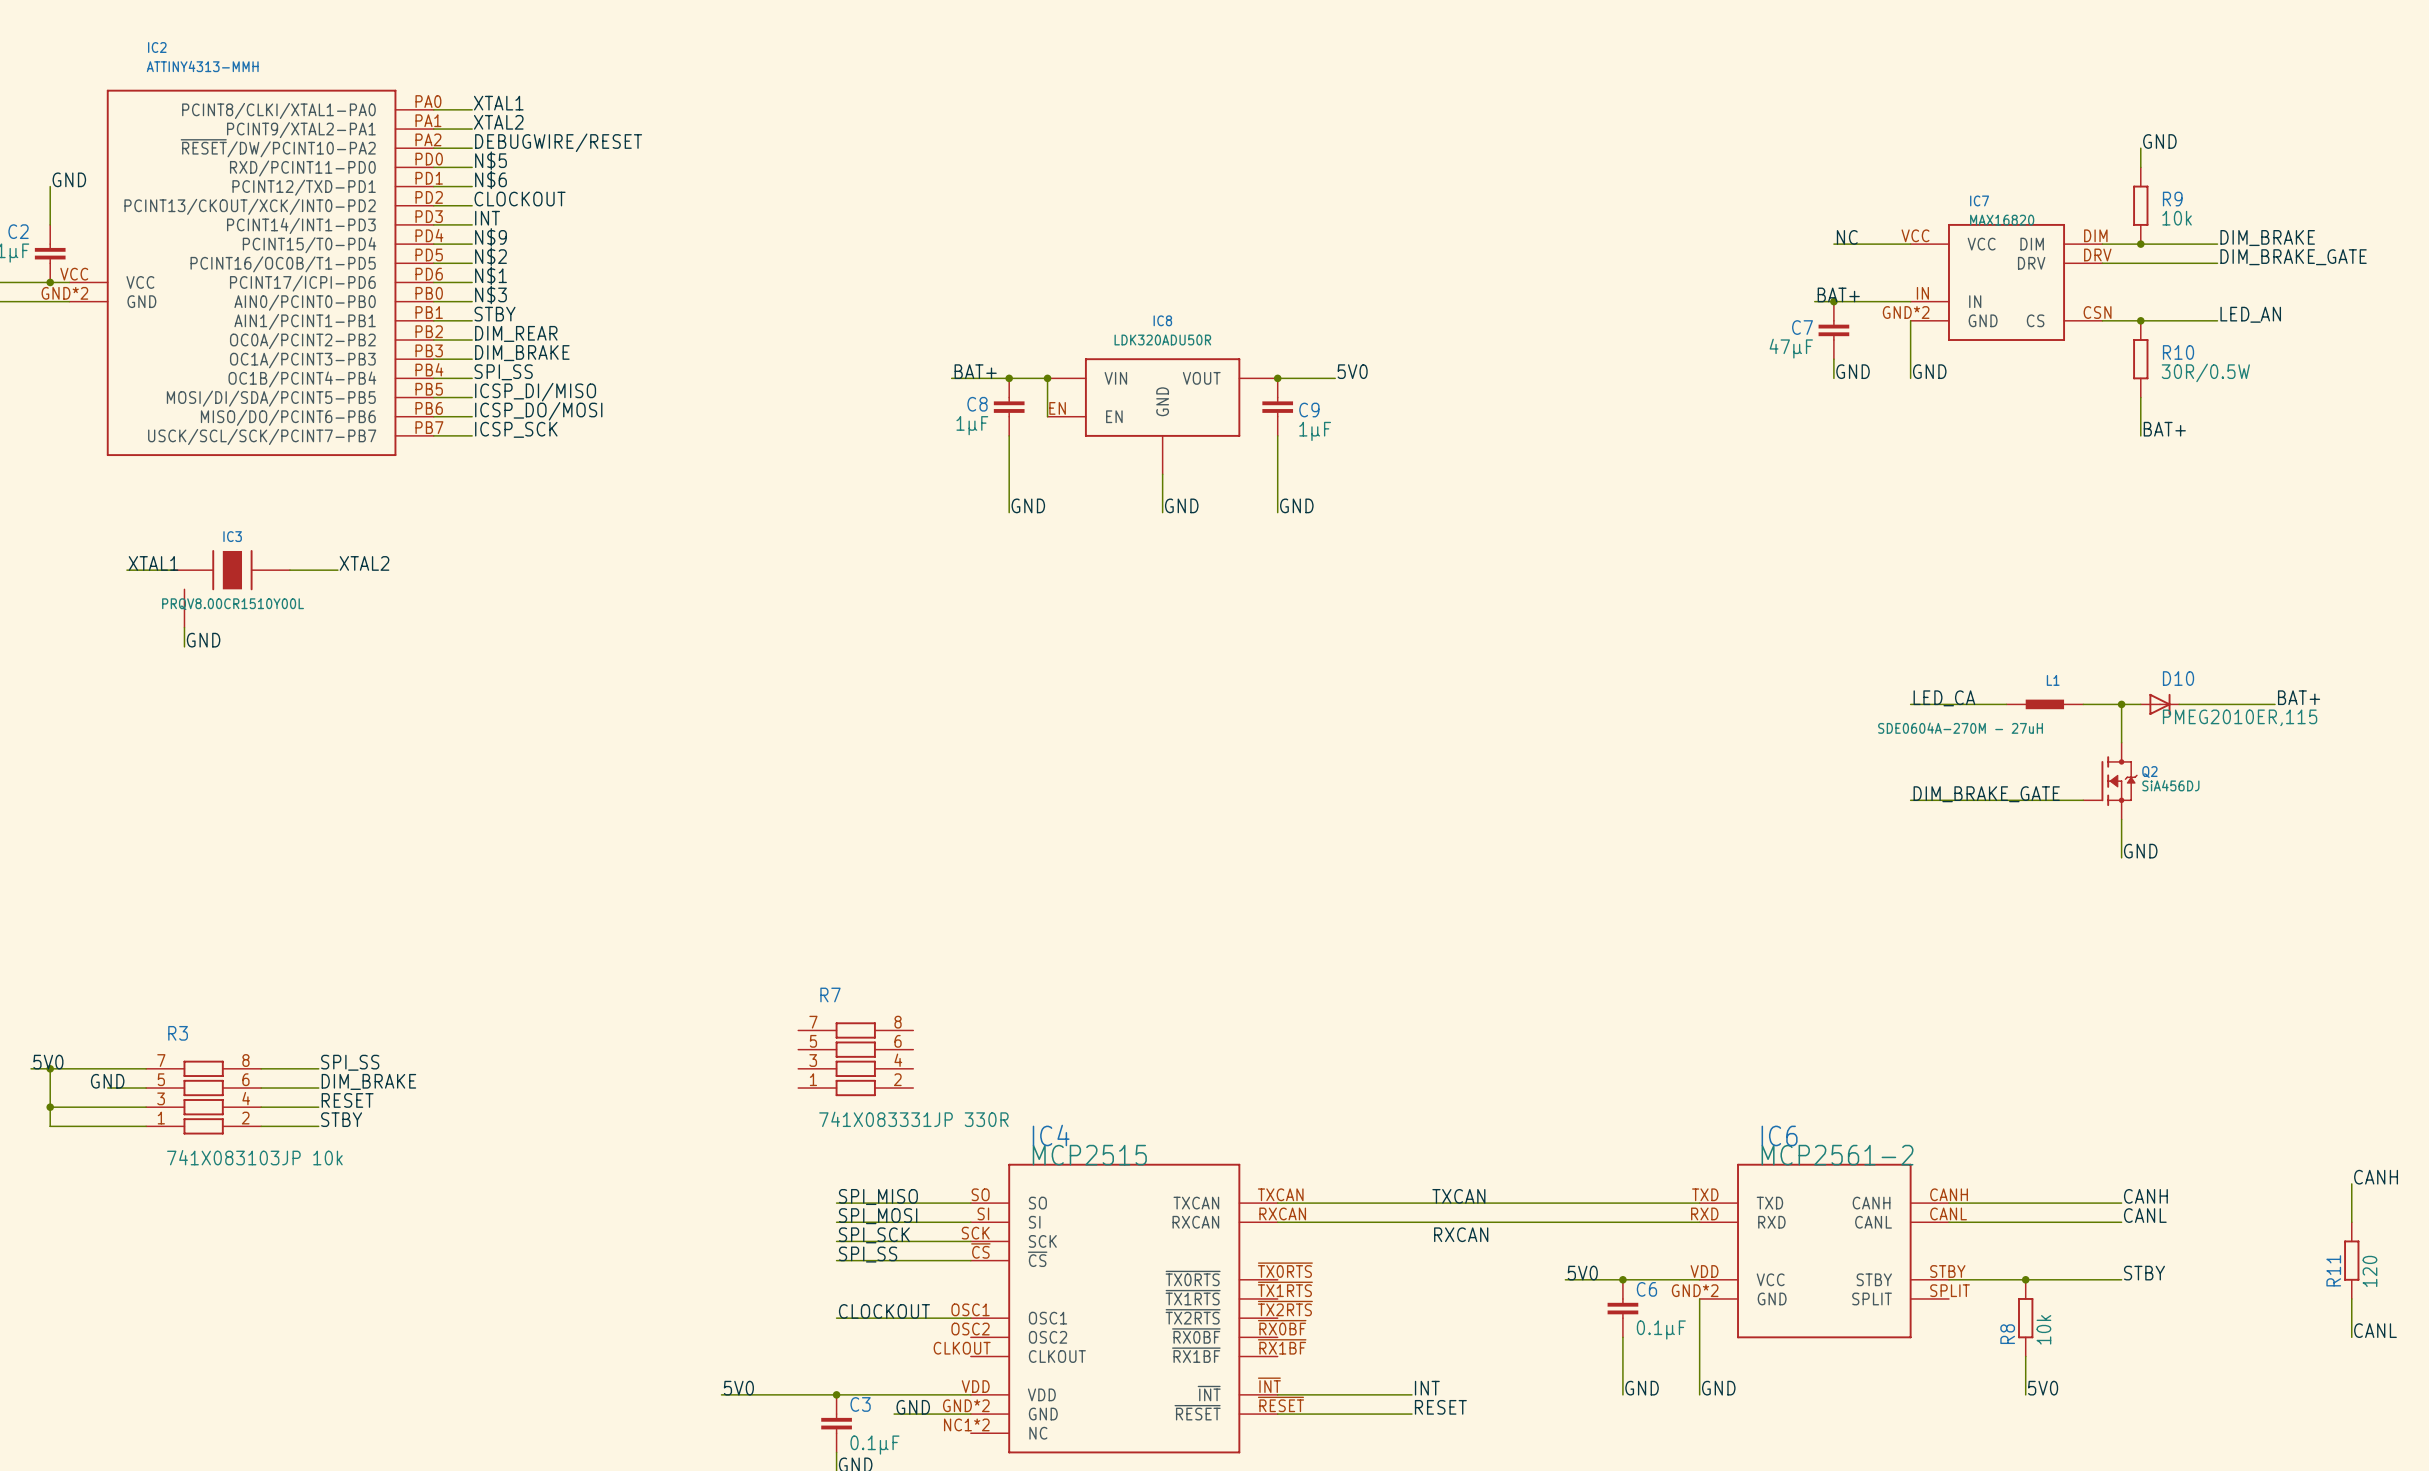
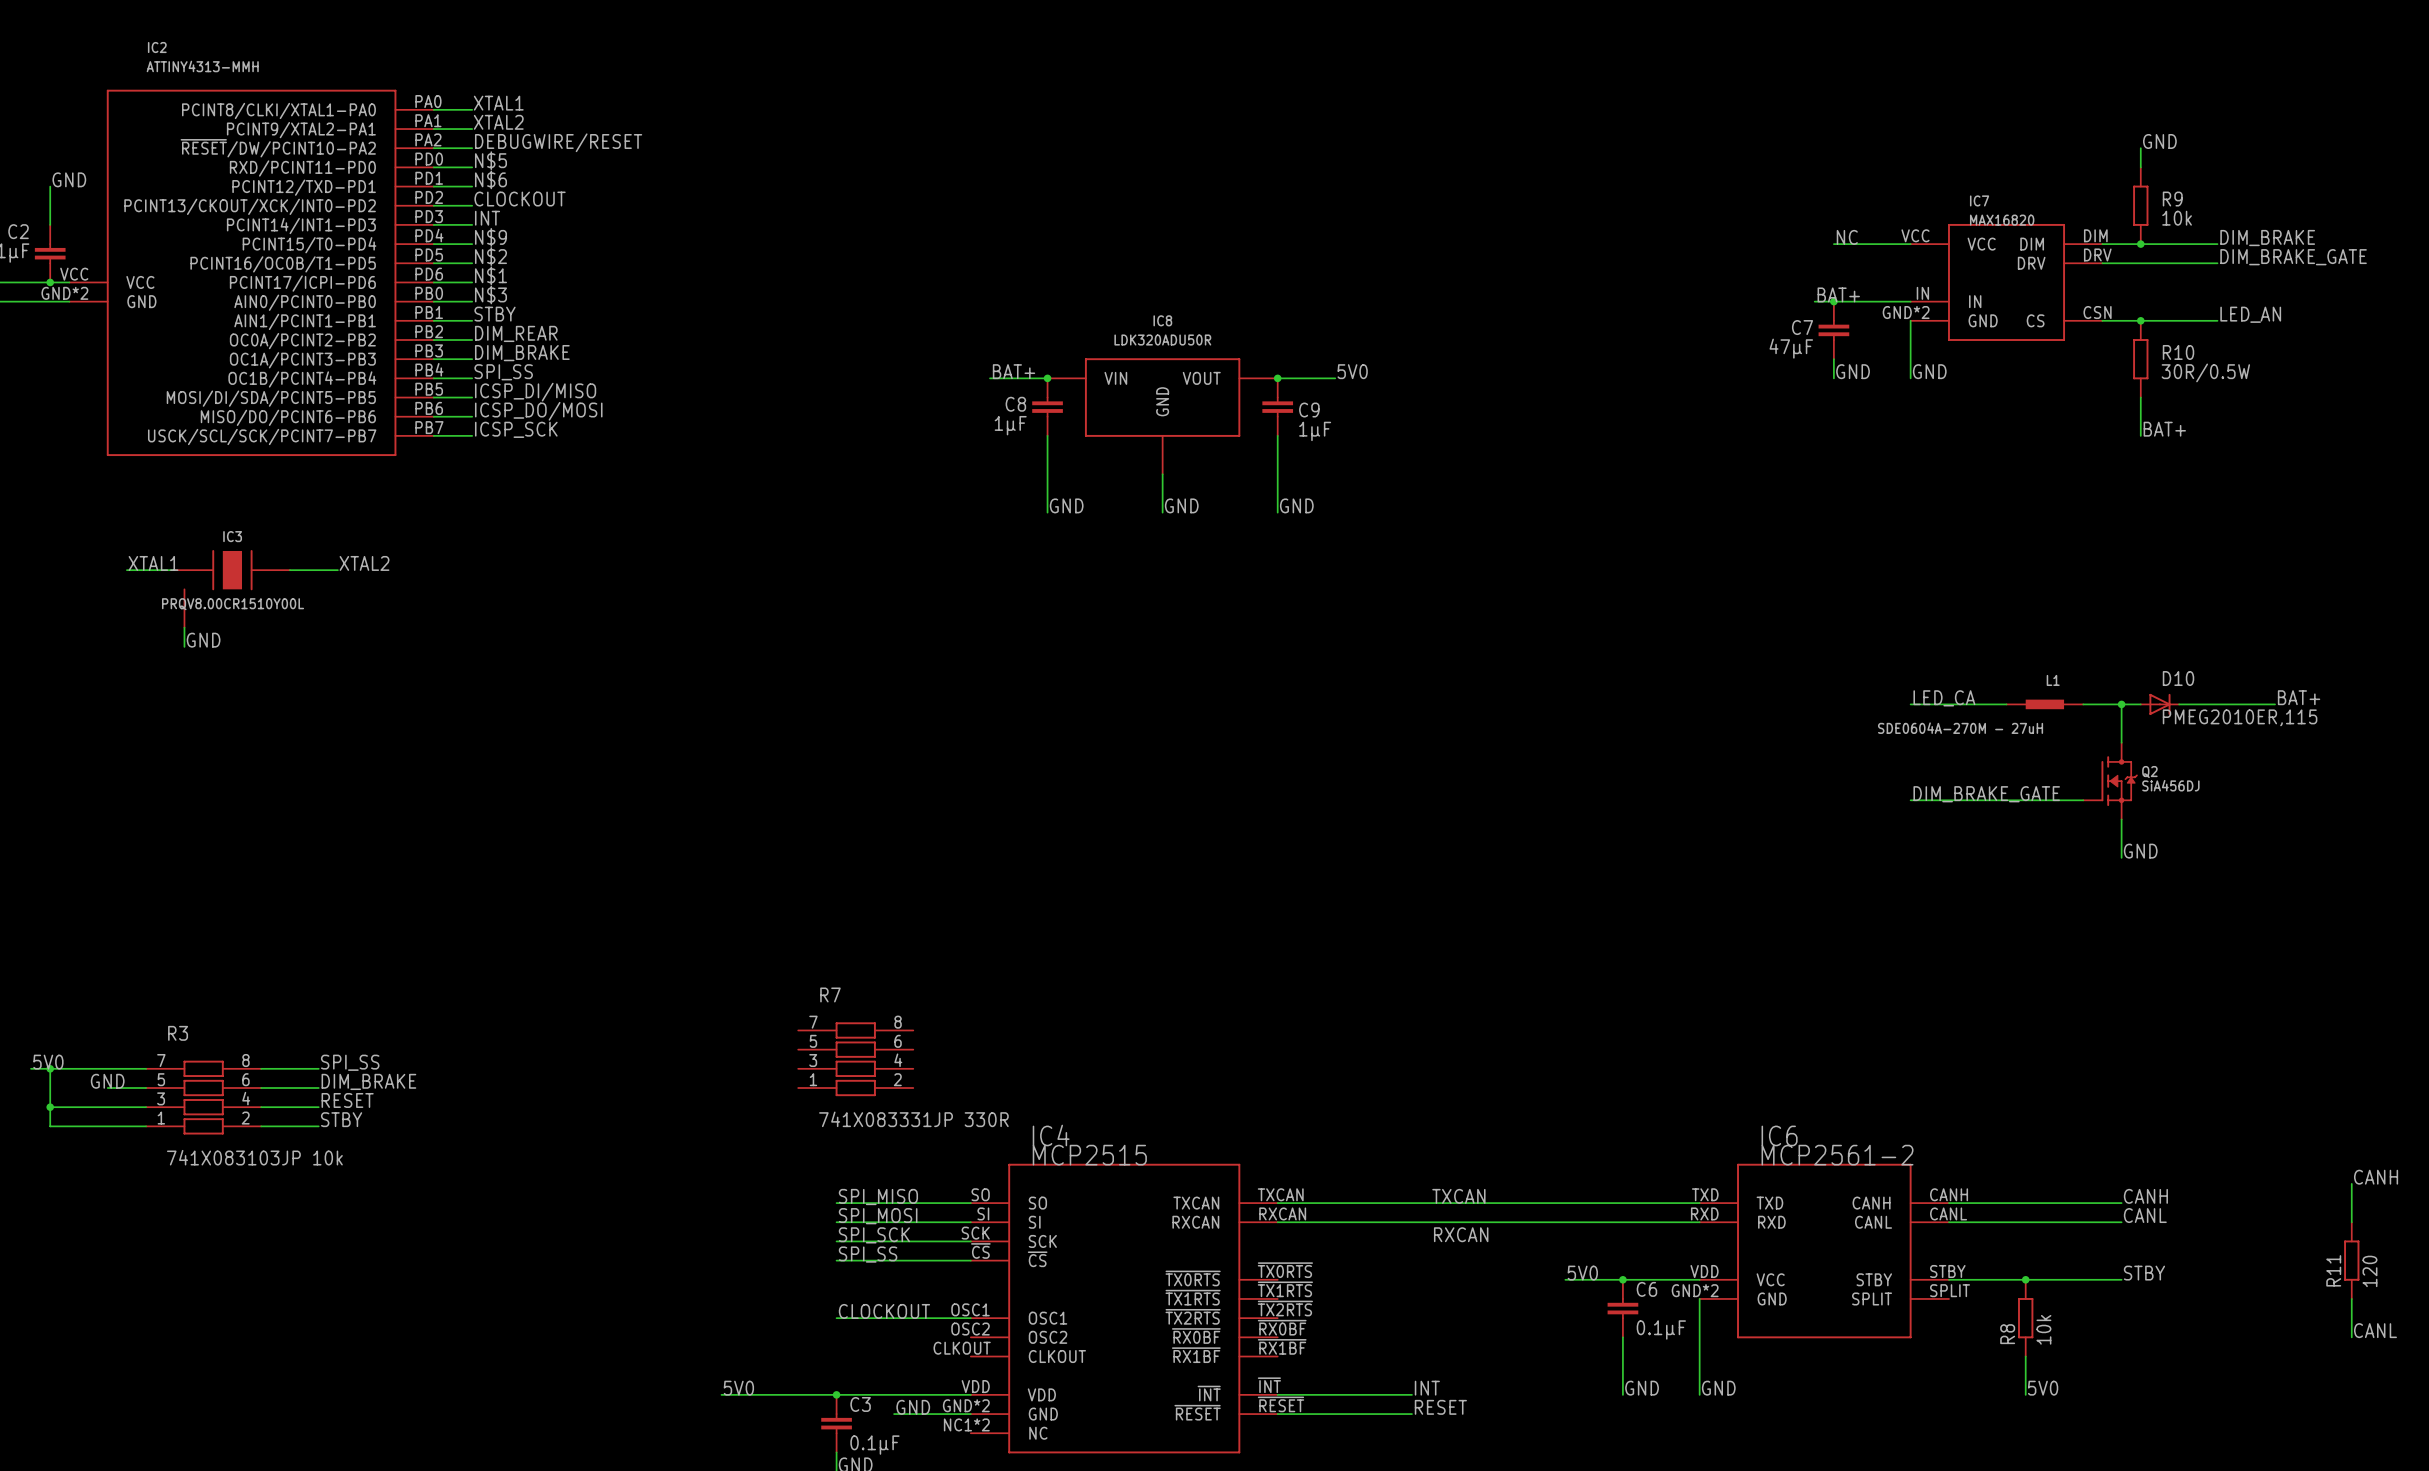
IC8 symbol: [1047, 358, 1278, 475] -> [1047, 358, 1278, 475]
label position: BAT+ (975, 371) -> BAT+ (1014, 371)
wire: (951, 378) (990, 378) -> none
junction: (1009, 378) -> none
C8 position: (1009, 407) -> (1047, 407)
wire: (1009, 435) (1009, 512) -> (1047, 435) (1047, 512)
label position: GND (1028, 505) -> GND (1066, 505)

